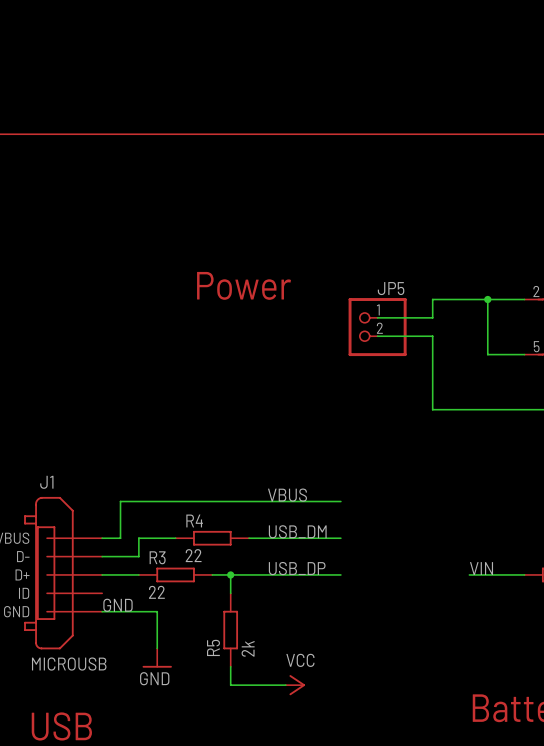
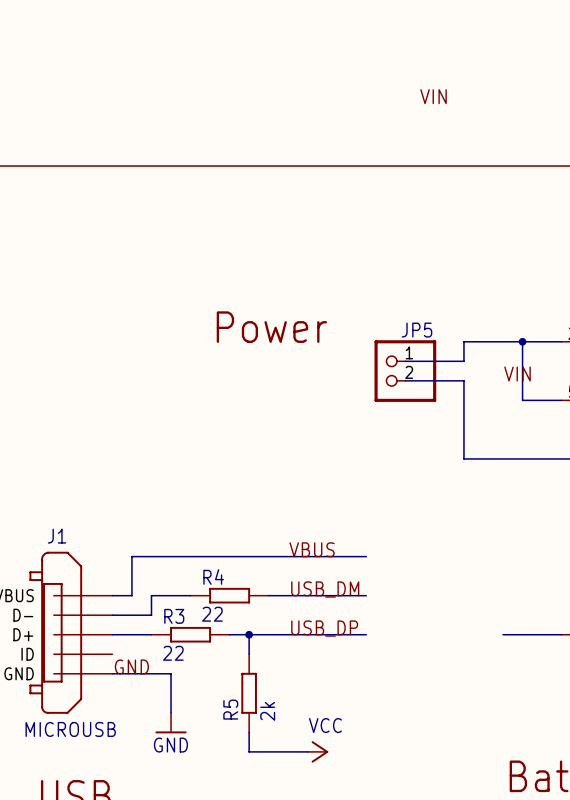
label: none -> VIN (433, 96)
label: none -> VIN (517, 374)
label: VIN (481, 568) -> none

